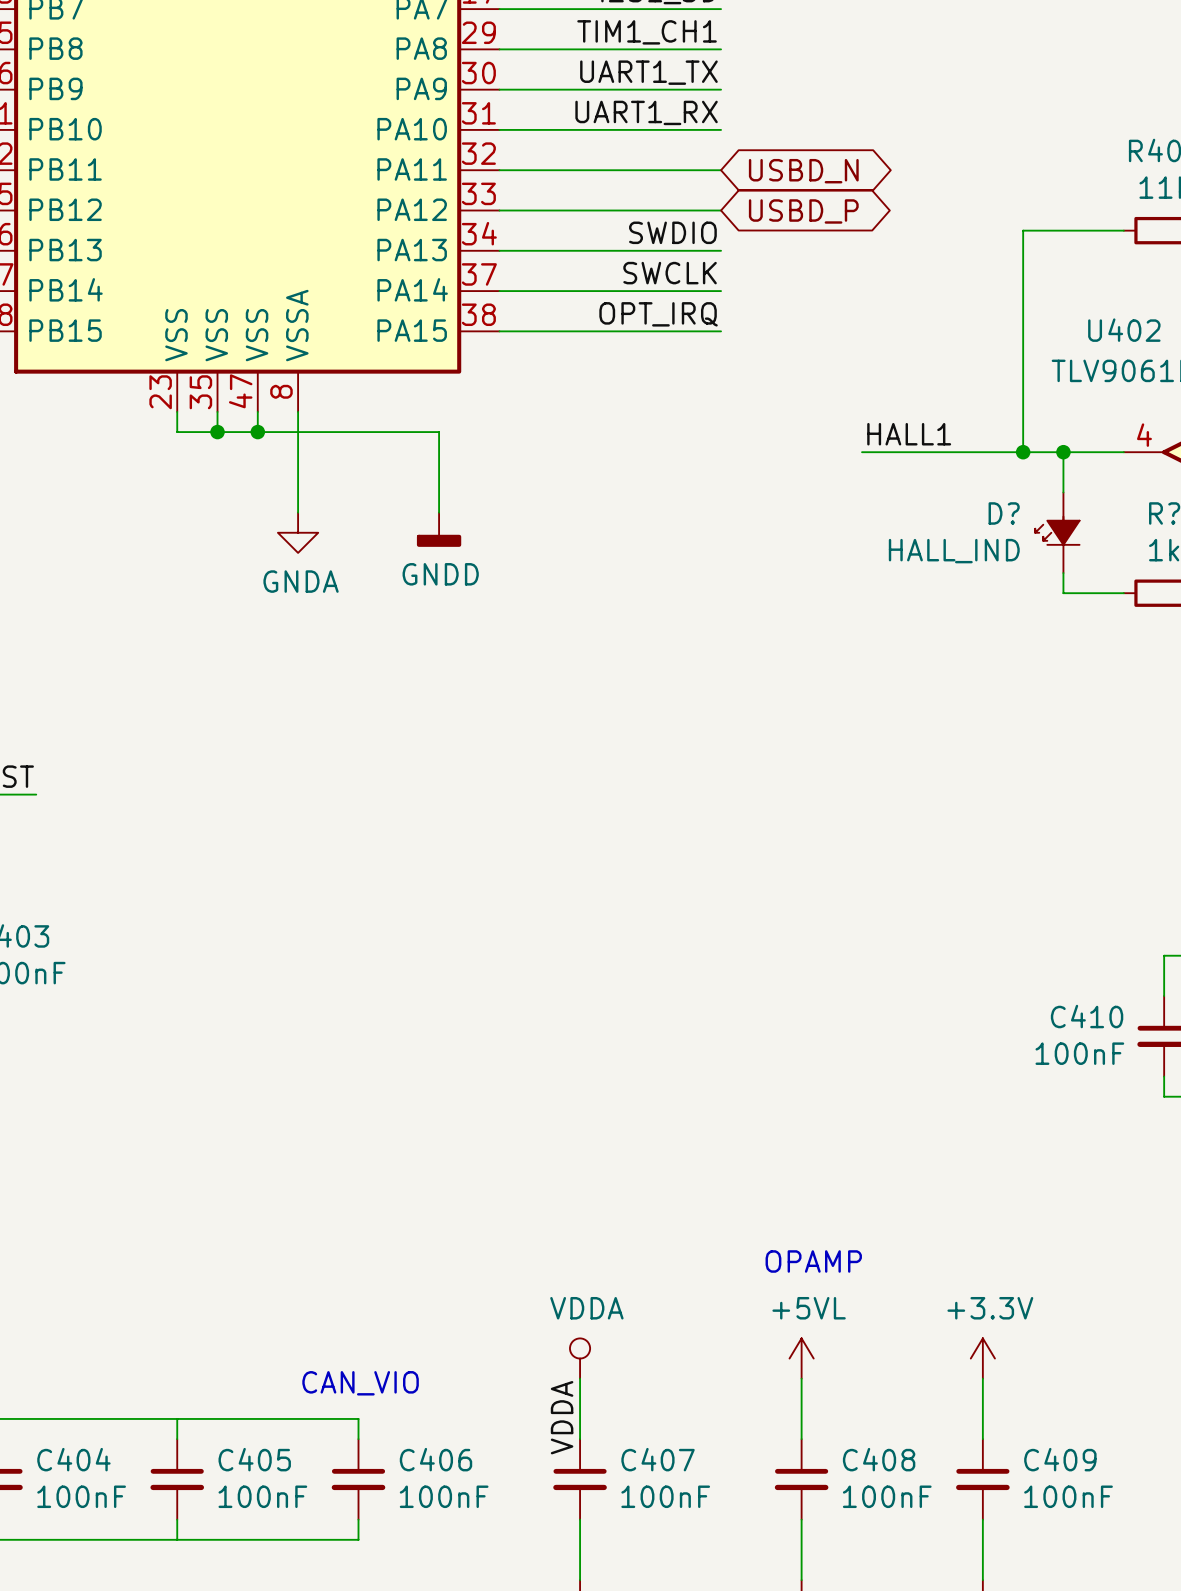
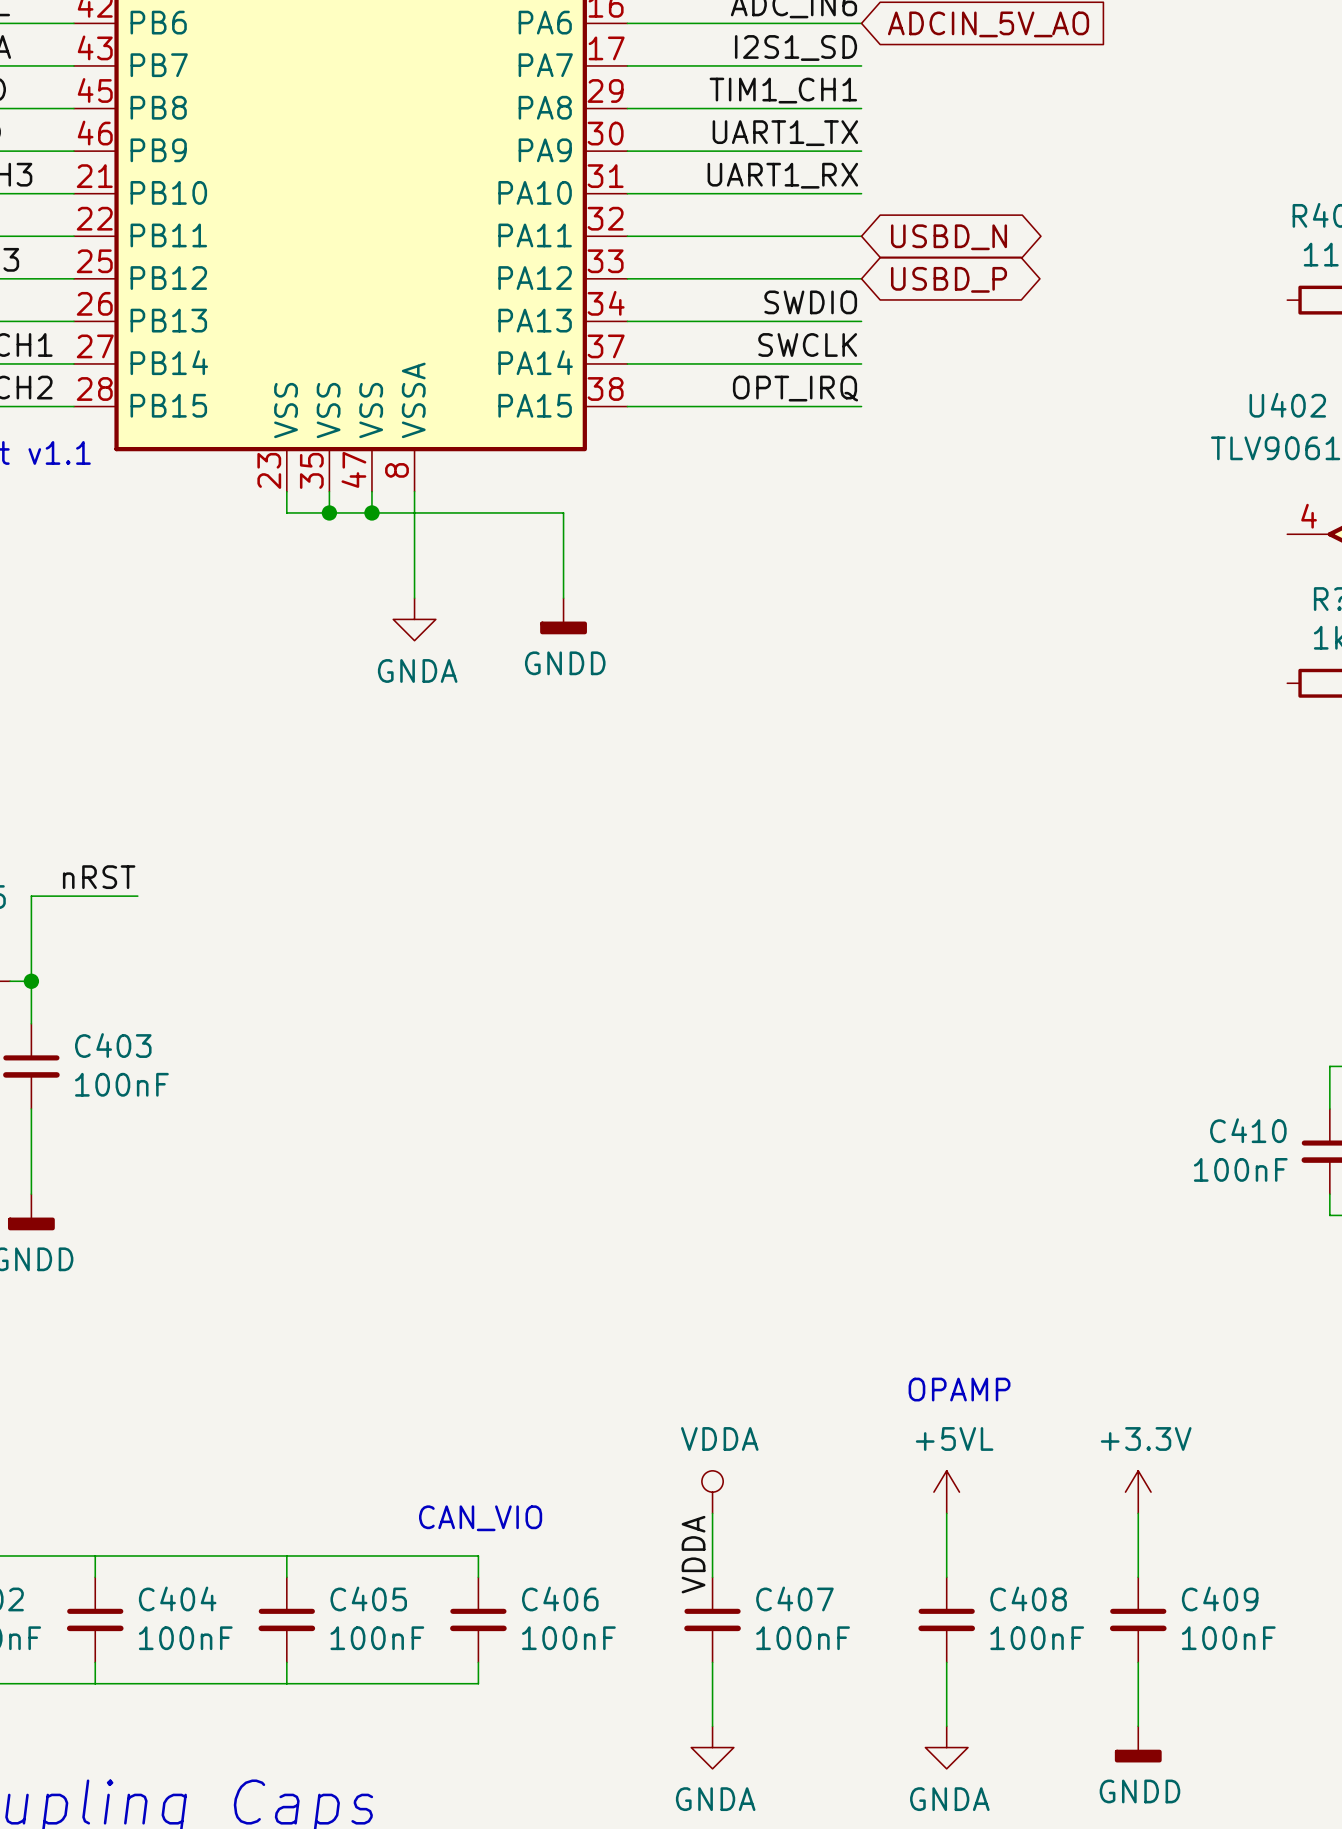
wire: (1123, 230) (1023, 230) (1023, 452) -> none
label: HALL1 (909, 434) -> none
wire: (862, 452) (1123, 452) -> none
junction: (1023, 452) -> none
wire: (1063, 452) (1063, 492) -> none
junction: (1063, 452) -> none
D?: HALL_IND (1057, 532) -> none
wire: (1063, 573) (1063, 593) (1123, 593) -> none

